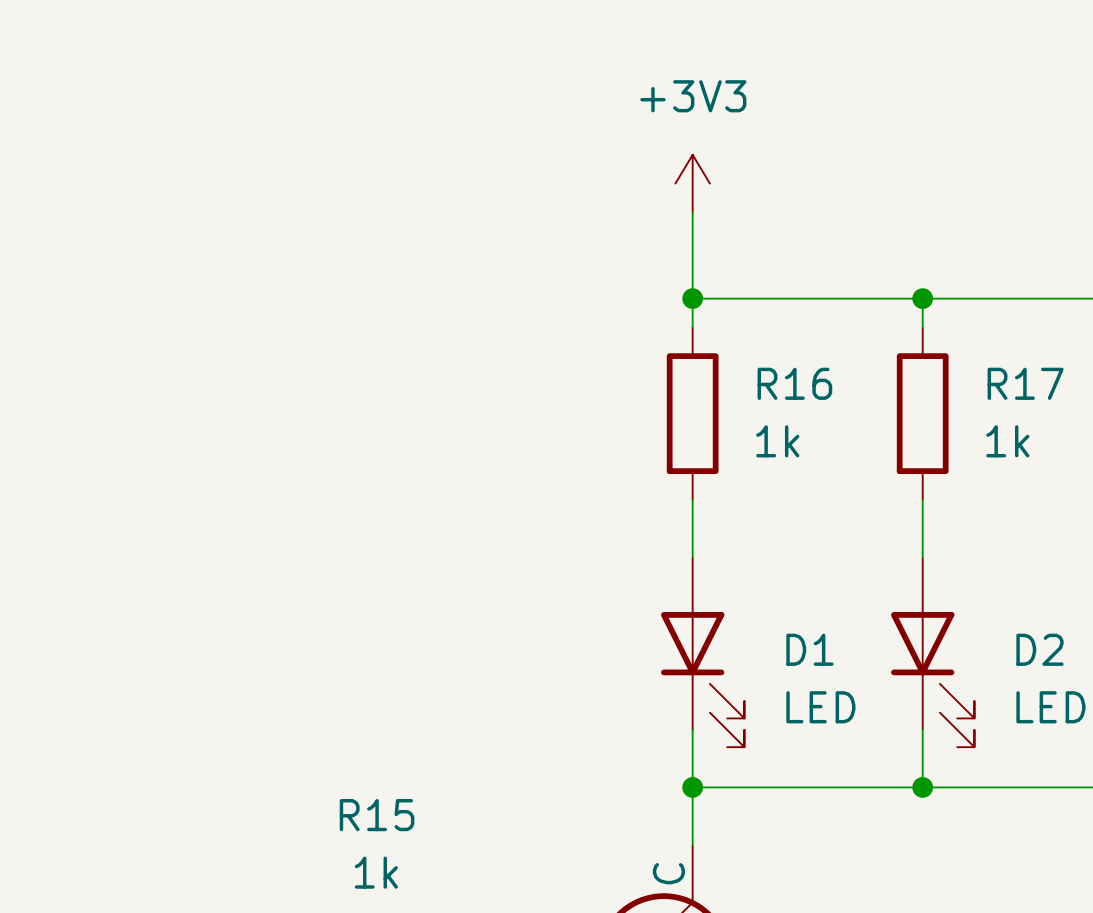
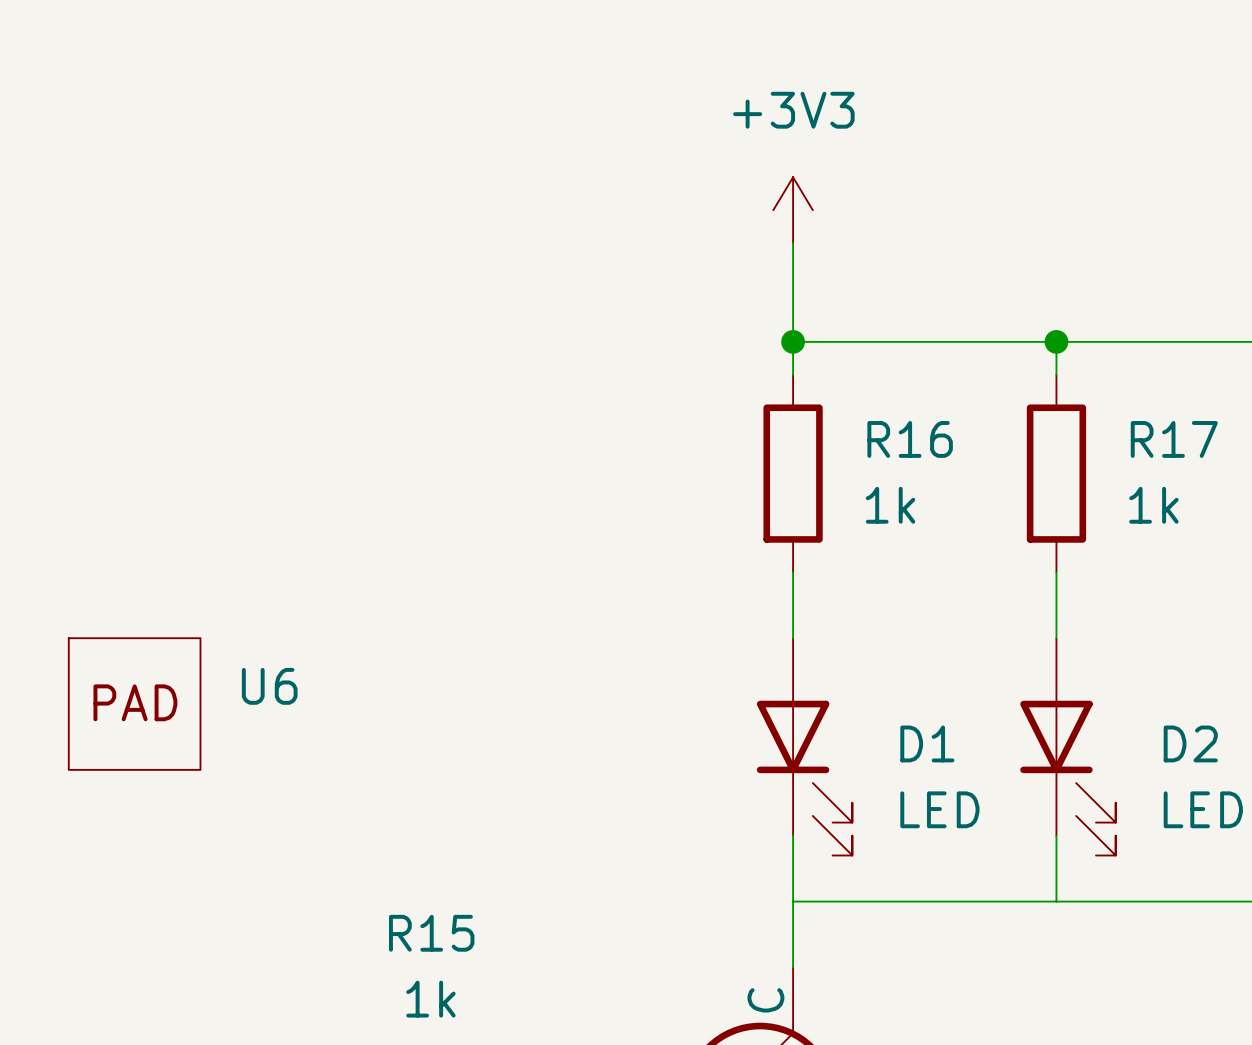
U6: none -> (134, 704)
junction: (692, 787) -> none
junction: (922, 787) -> none

